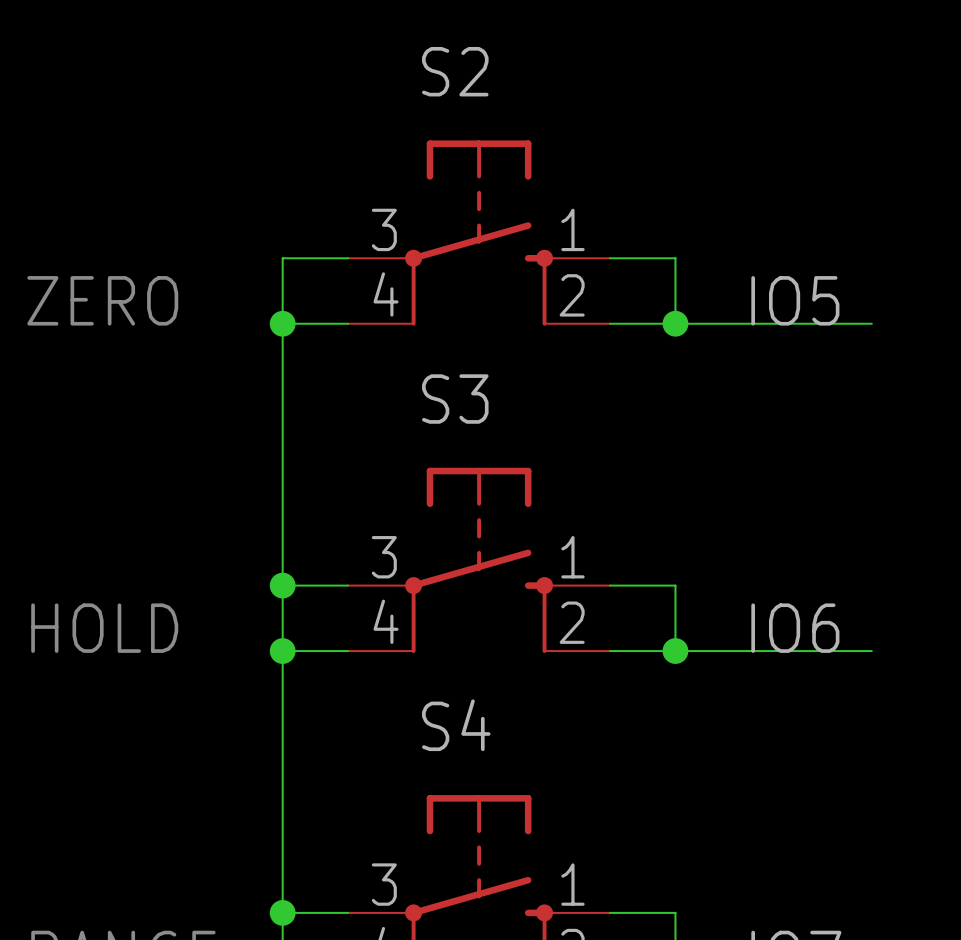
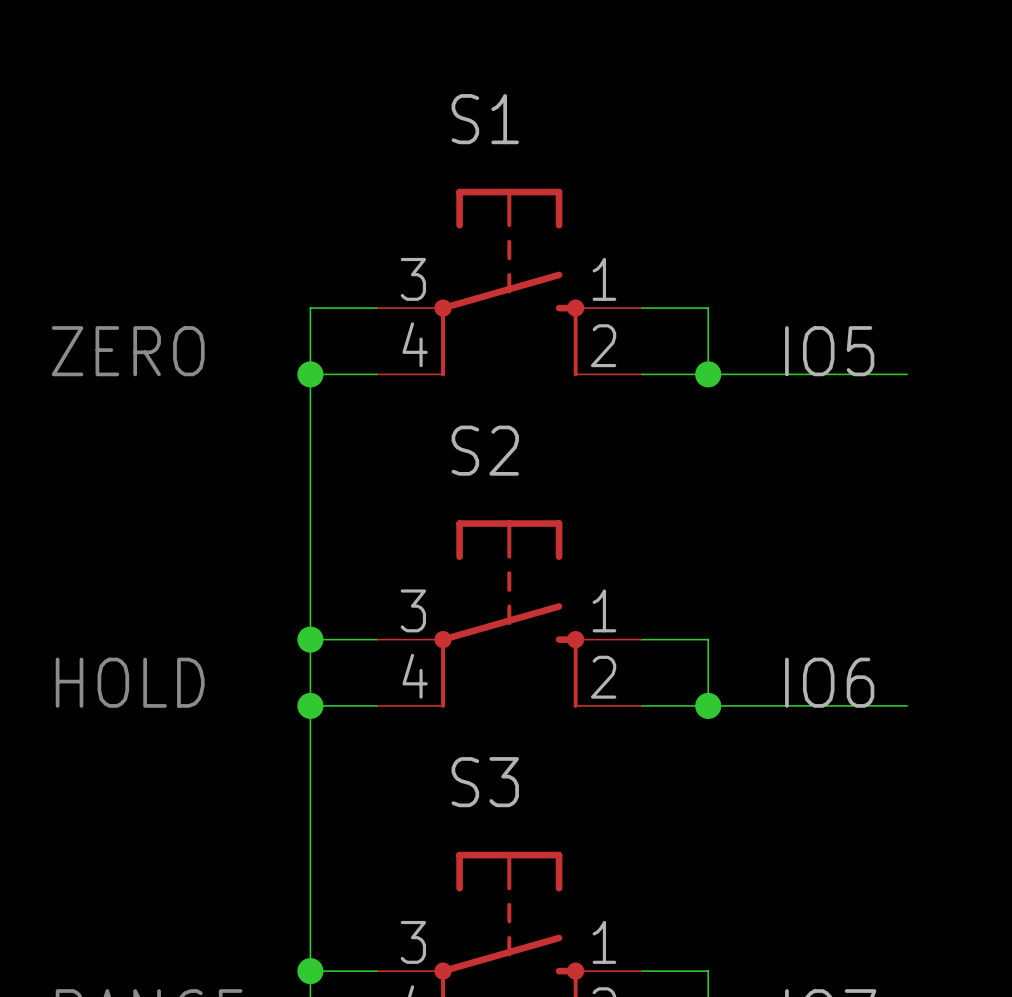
S2 name: S2 (455, 71) -> S1 (485, 119)
S3 name: S3 (455, 399) -> S2 (485, 450)
S4 name: S4 (456, 725) -> S3 (485, 782)

